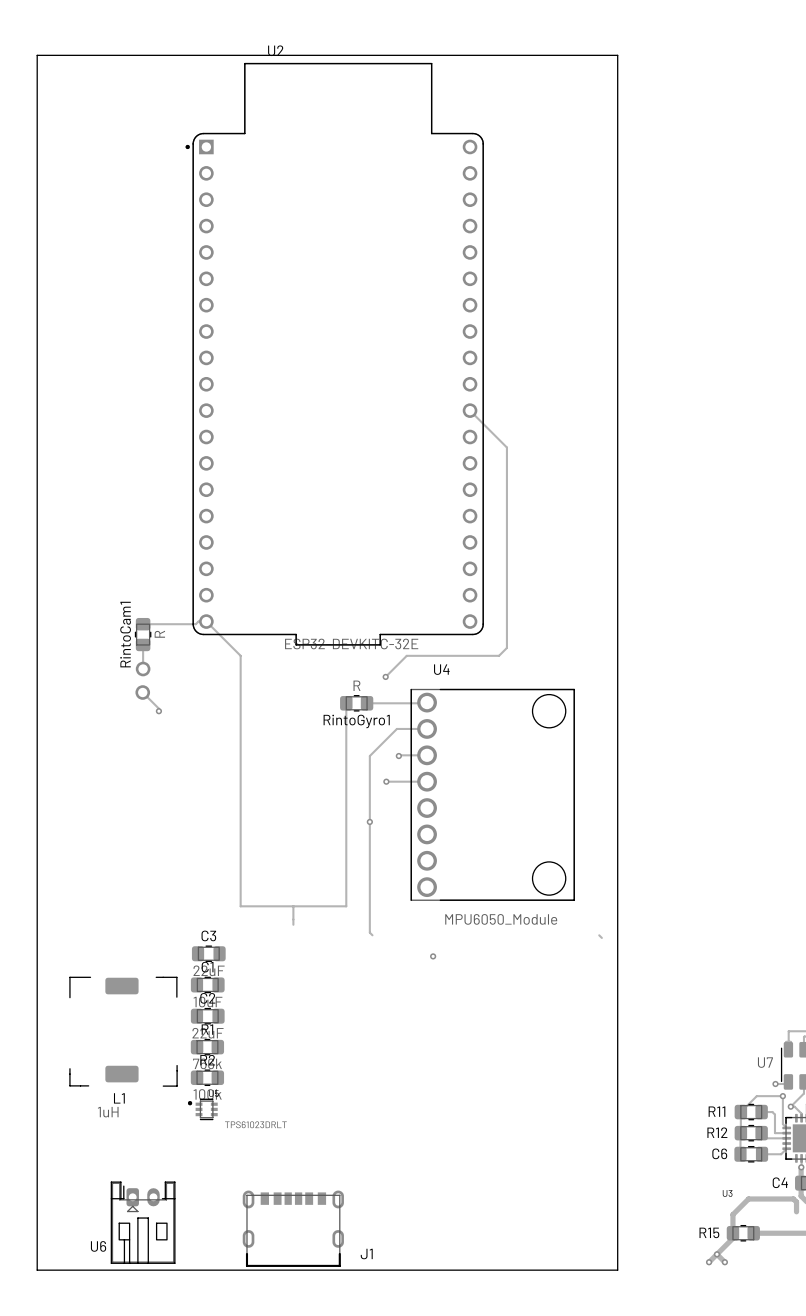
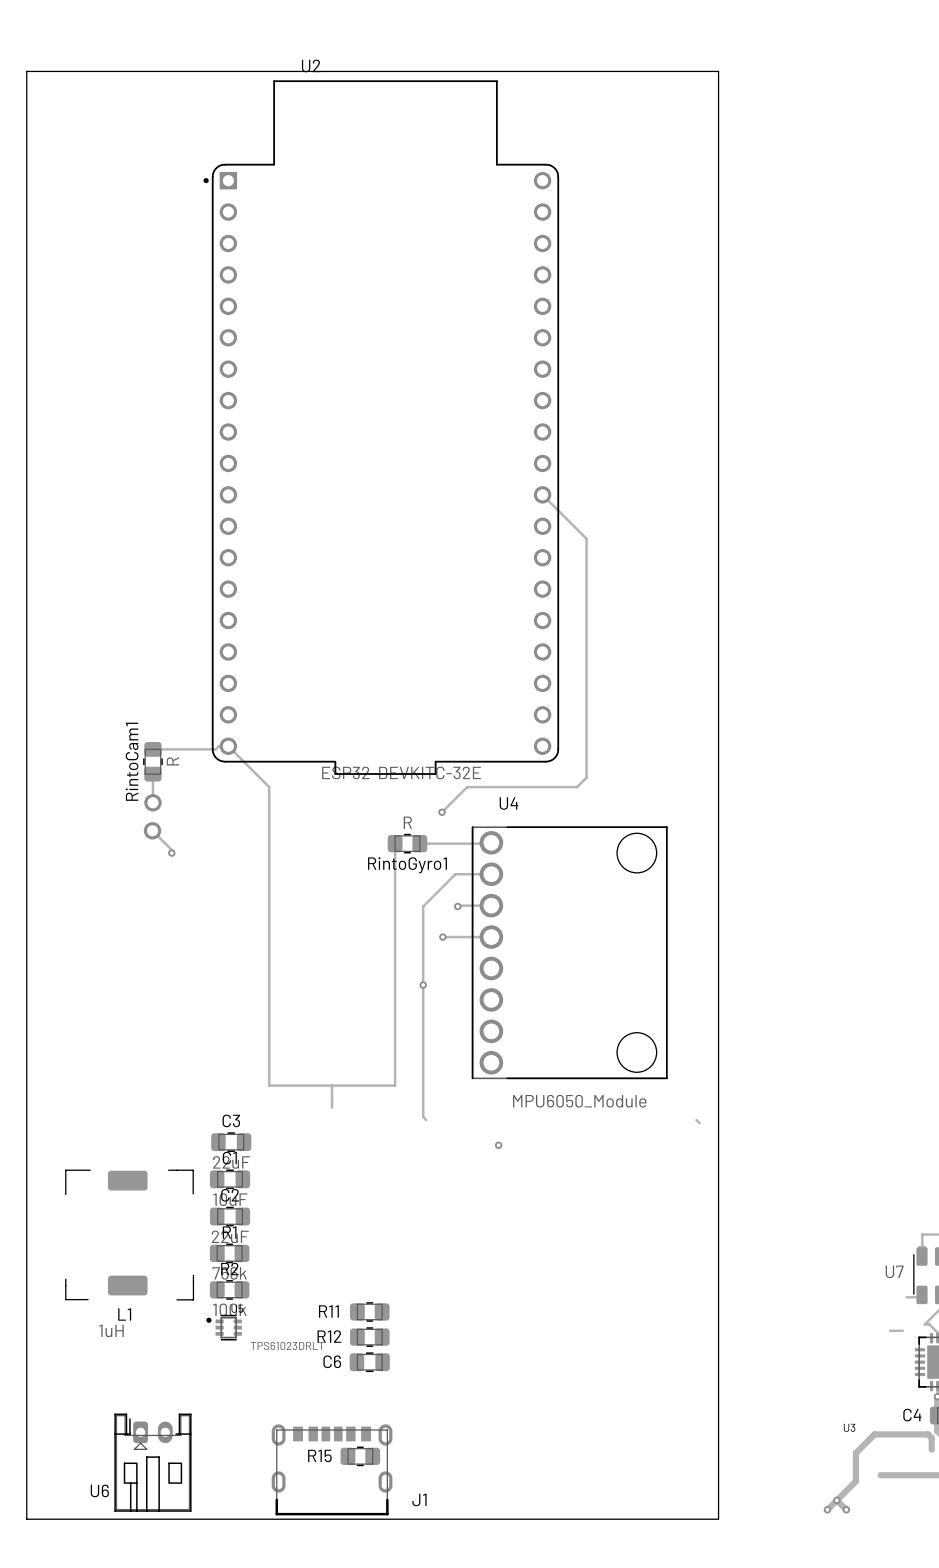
via: (775, 1083) -> none
via: (782, 1096) -> none
via: (790, 1106) -> none
track: (772, 1111) (774, 1114) (774, 1133) -> none
R11 position: (751, 1112) -> (369, 1311)
track: (786, 1127) (782, 1124) (782, 1096) (756, 1096) (740, 1112) (740, 1159) -> none
R12 position: (751, 1133) -> (369, 1337)
track: (761, 1133) (766, 1138) (786, 1138) -> none
track: (775, 1133) (786, 1133) -> none
track: (786, 1148) (781, 1154) (767, 1154) -> none
C6 position: (751, 1154) -> (369, 1362)
R15 position: (743, 1233) -> (360, 1456)

